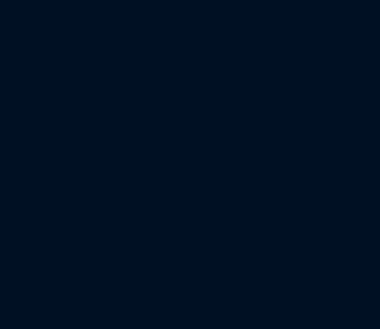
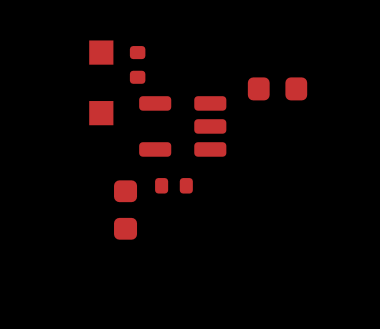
part: none -> (101, 52)
part: none -> (137, 64)
part: none -> (277, 88)
part: none -> (101, 113)
part: none -> (182, 126)
part: none -> (173, 185)
part: none -> (125, 210)

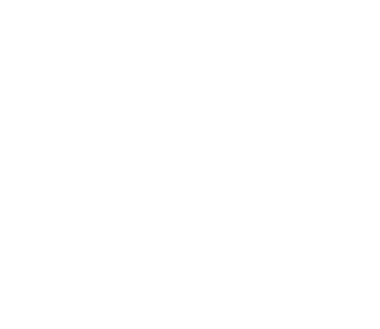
part: (101, 52) -> none
part: (137, 64) -> none
part: (277, 88) -> none
part: (101, 113) -> none
part: (182, 126) -> none
part: (173, 185) -> none
part: (125, 210) -> none

